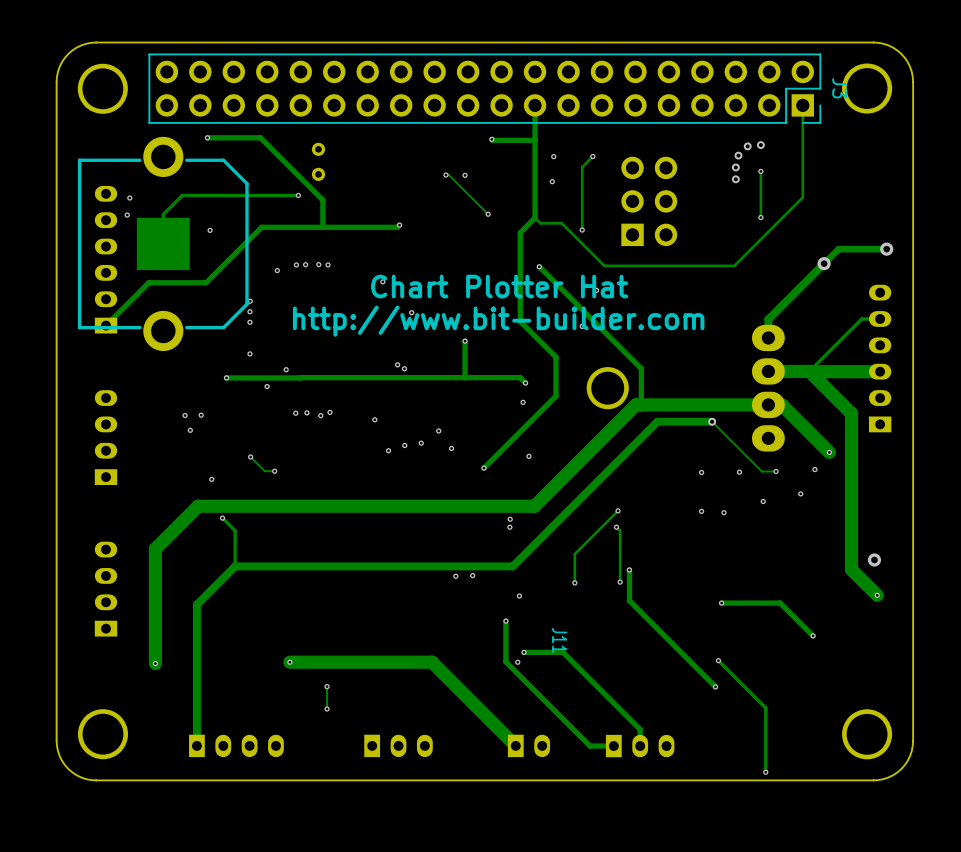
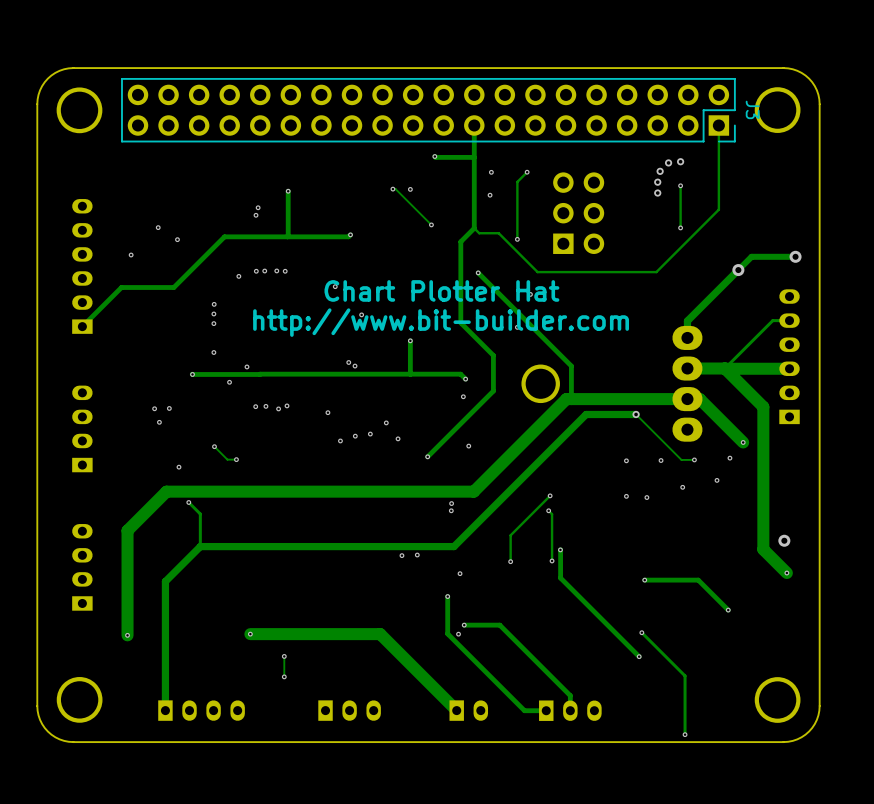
track: (207, 137) (260, 137) (322, 200) (322, 227) -> none
via: (207, 137) -> none
part: (318, 161) -> none
track: none -> (288, 191) (287, 236)
via: none -> (288, 191)
track: (298, 195) (182, 195) (163, 214) (163, 243) -> none
via: (129, 198) -> none
via: none -> (256, 215)
via: (127, 215) -> none
via: none -> (158, 227)
J11: (163, 243) -> none
via: none -> (131, 255)

